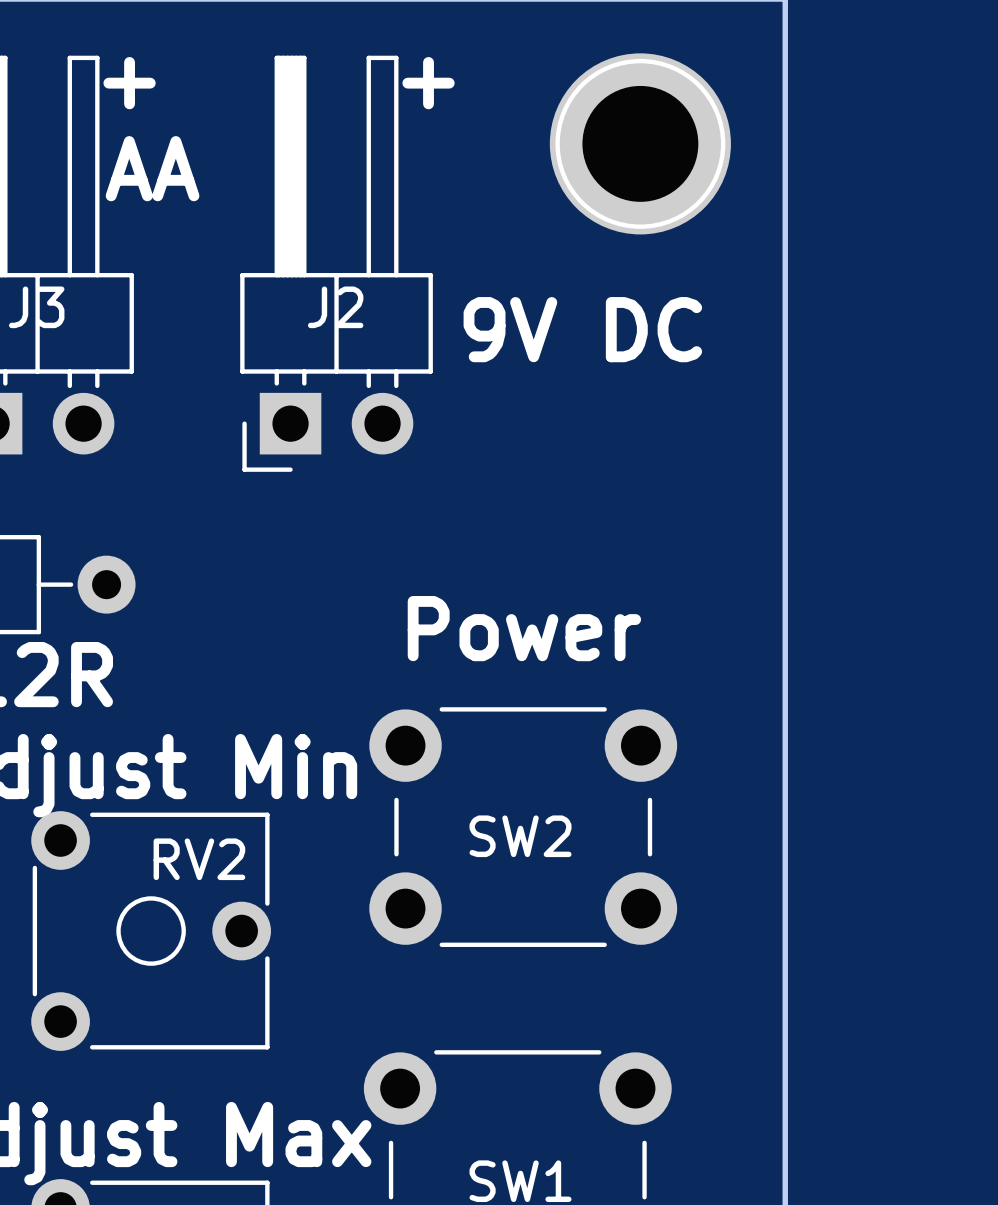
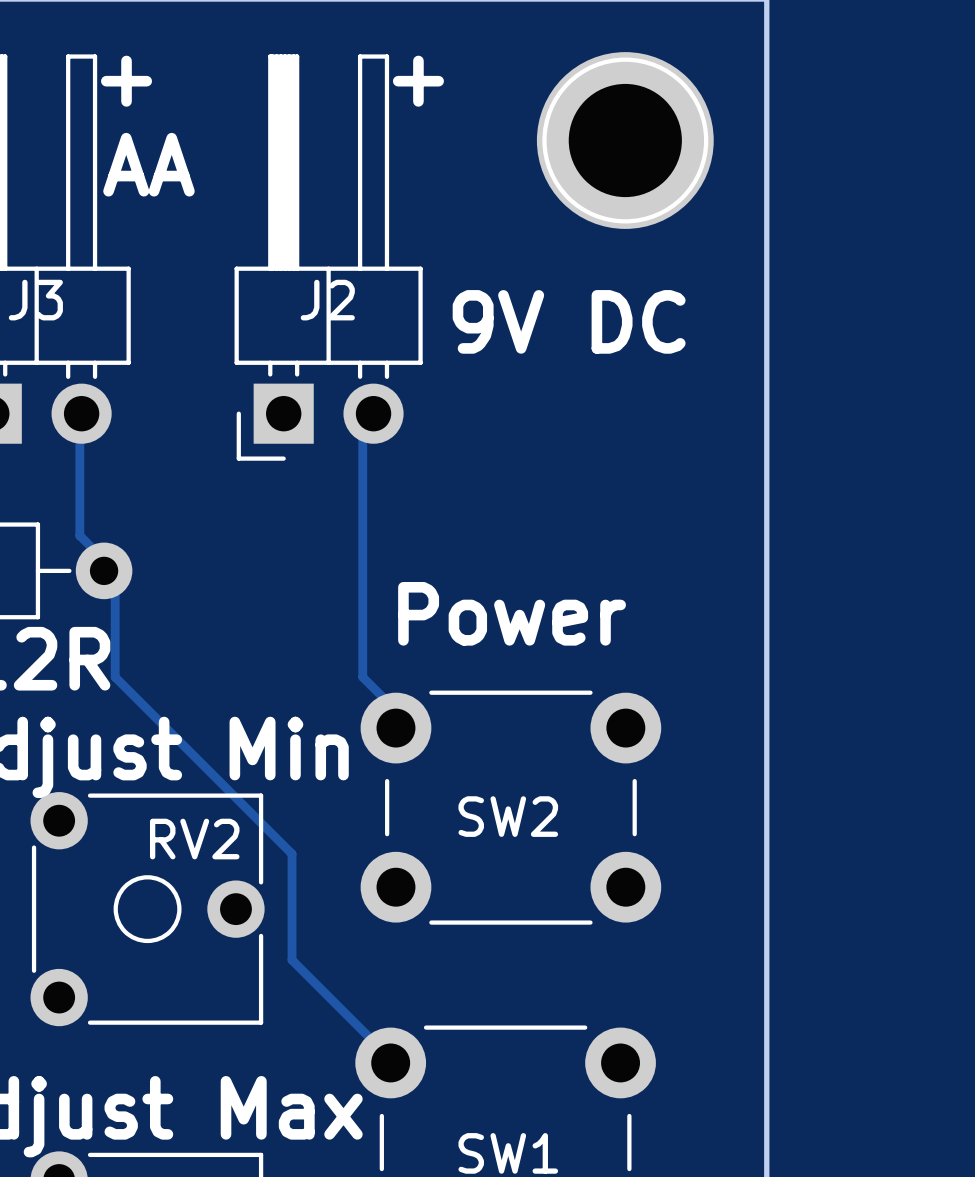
track: none -> (81, 413) (79, 429) (79, 535) (115, 571)
track: none -> (373, 413) (362, 429) (362, 677) (398, 712) (395, 728)
track: none -> (115, 571) (115, 677) (292, 853) (292, 960) (398, 1066) (390, 1062)

